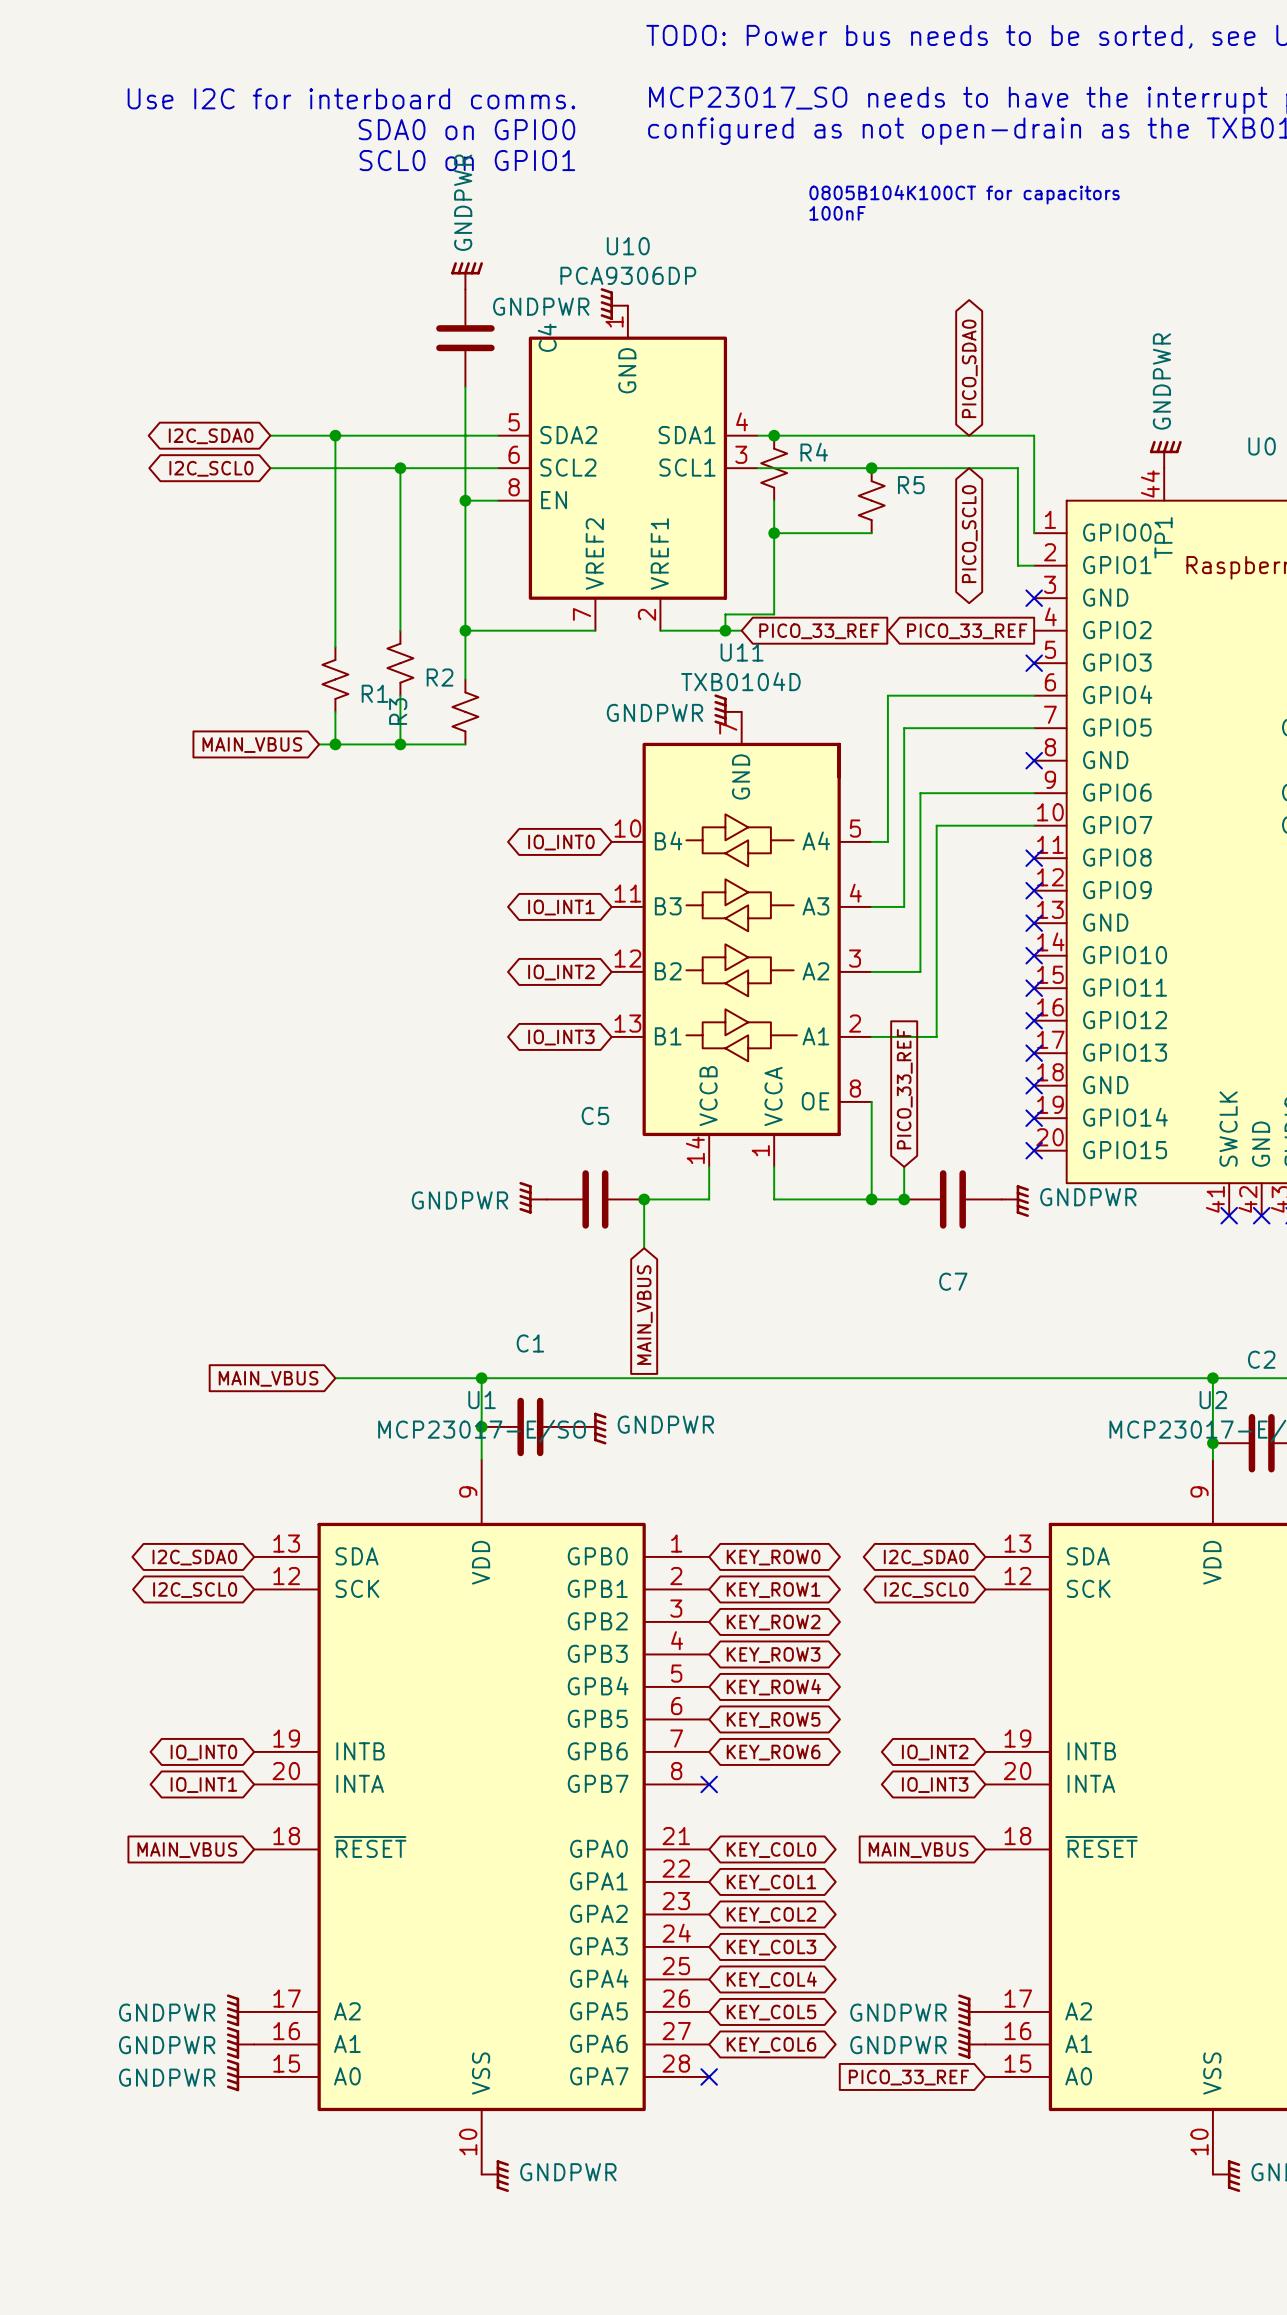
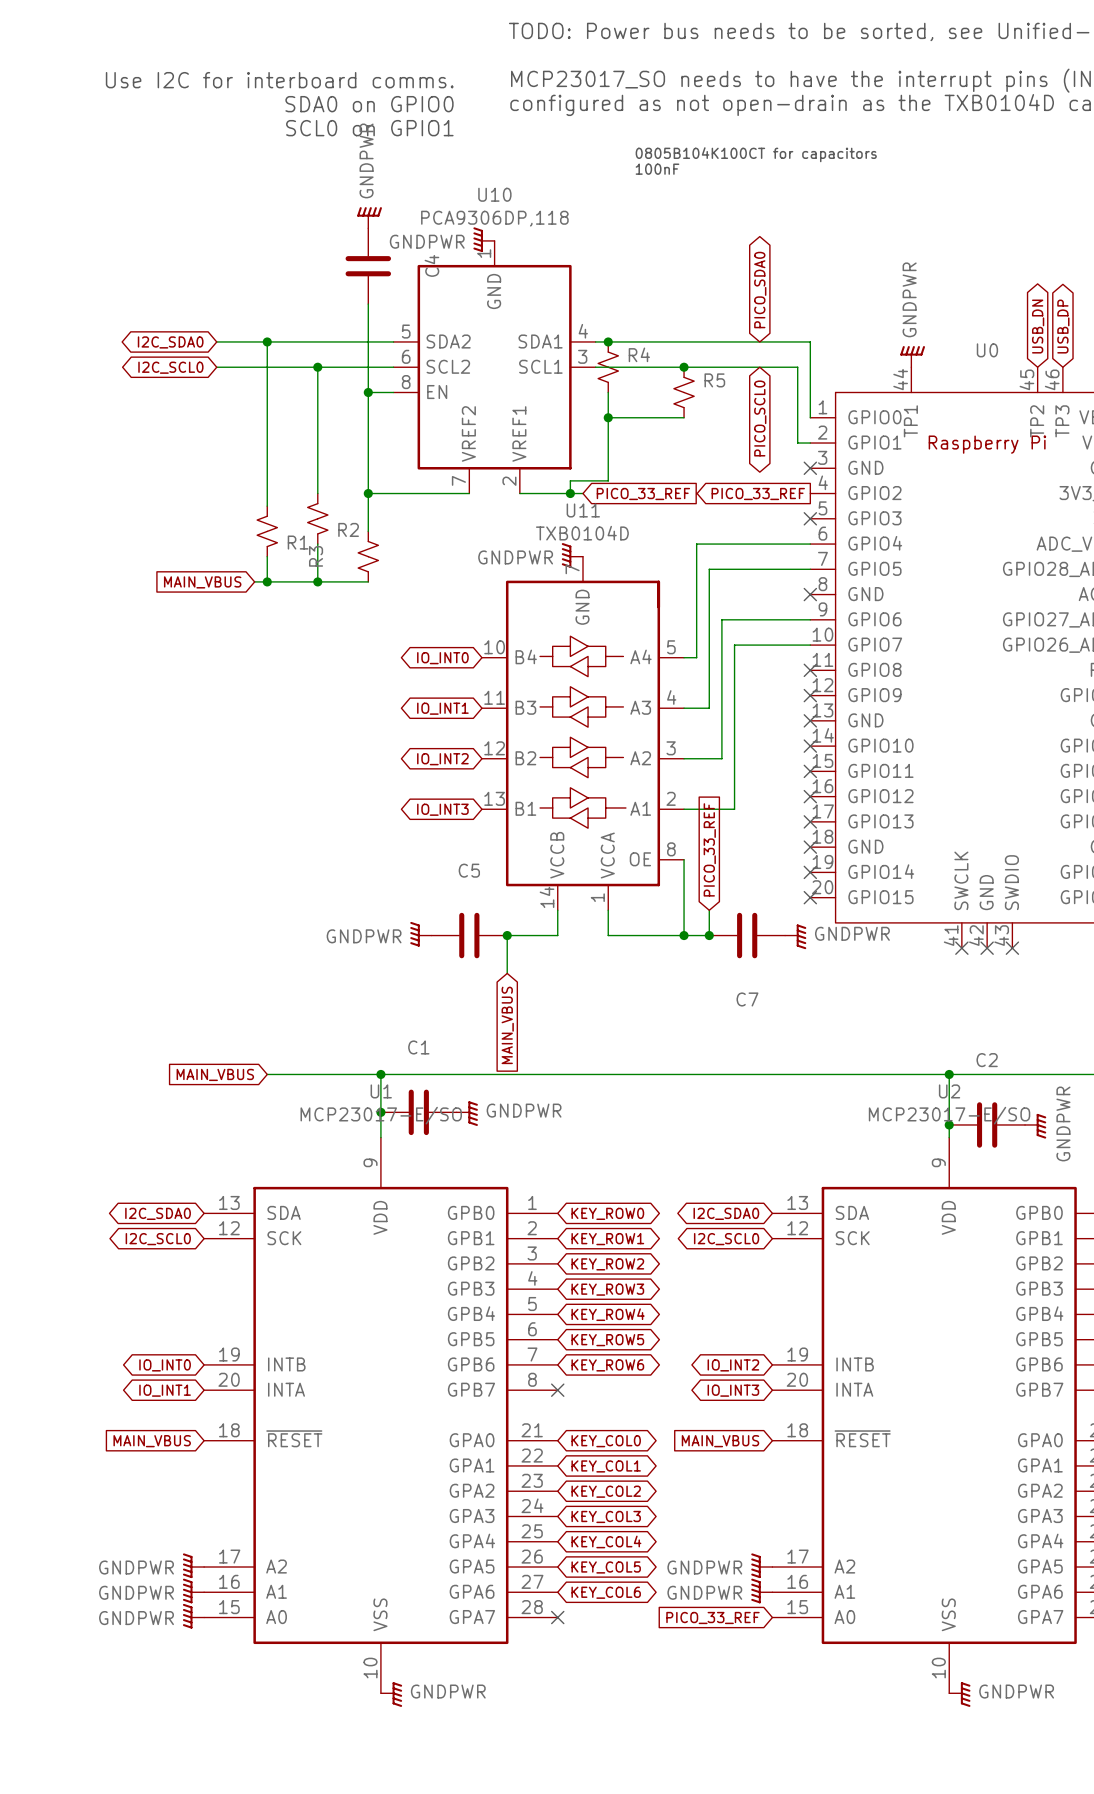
U10 value: PCA9306DP (628, 275) -> PCA9306DP,118 (494, 218)

